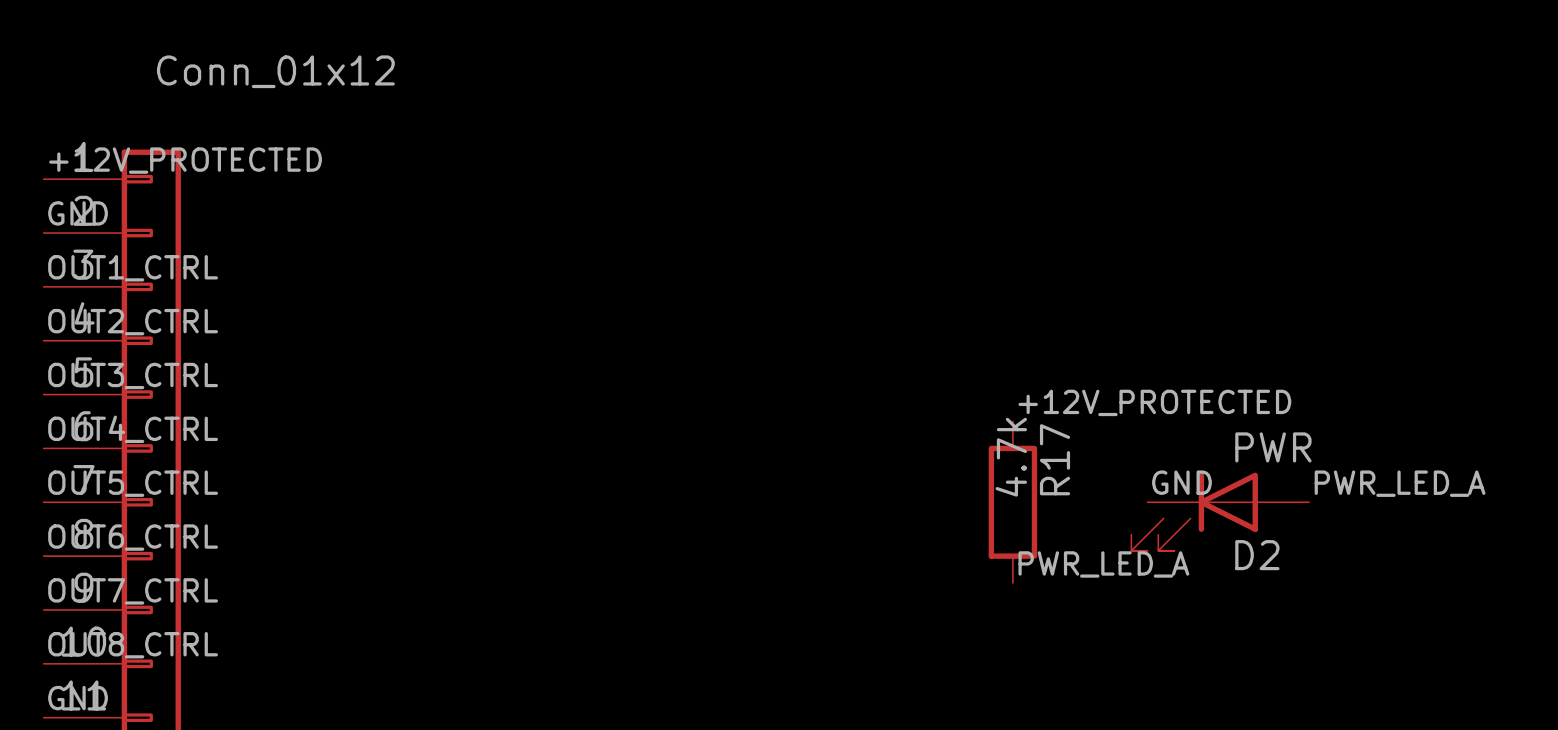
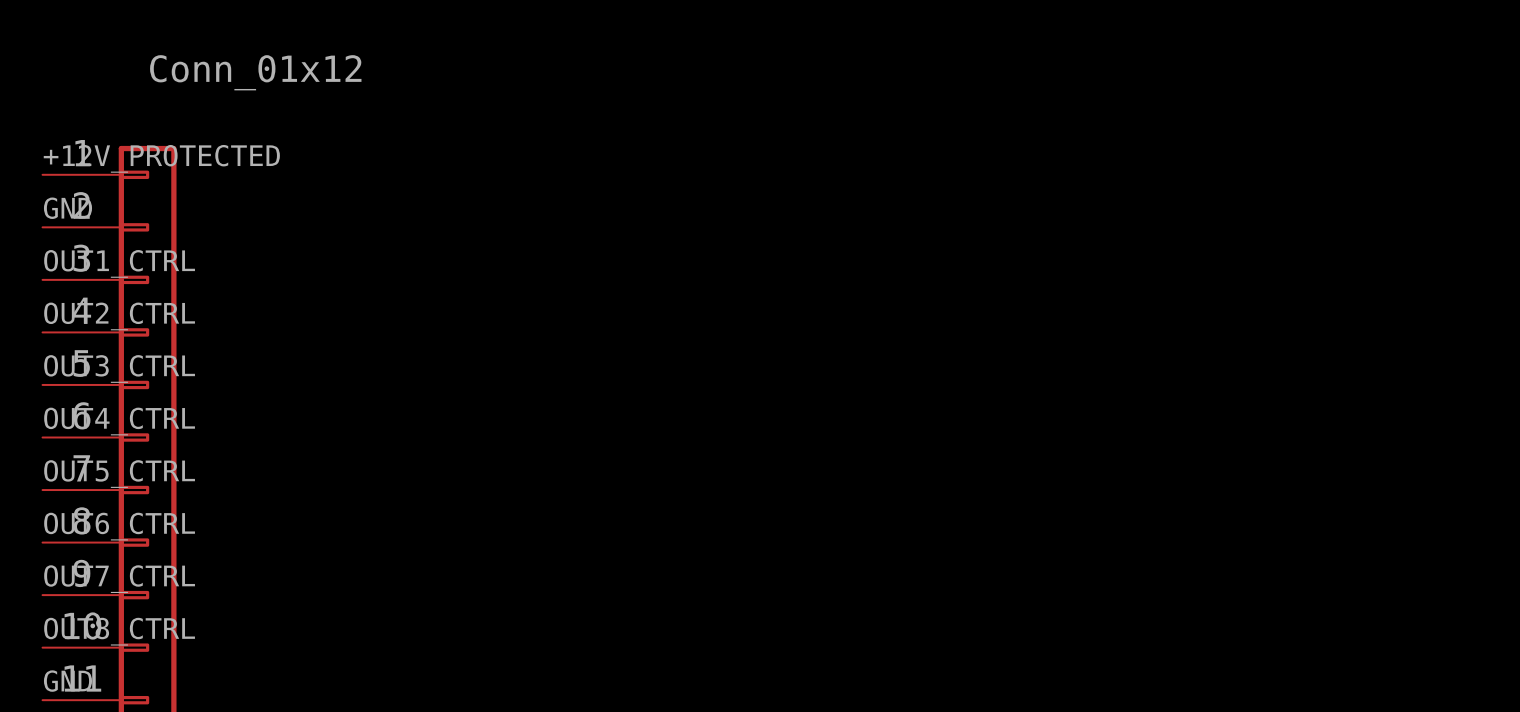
label: +12V_PROTECTED (1154, 402) -> none
label: GND (1181, 482) -> none
label: PWR_LED_A (1400, 483) -> none
R17: 4.7k (1012, 502) -> none
D2: PWR (1220, 511) -> none
label: PWR_LED_A (1103, 564) -> none

